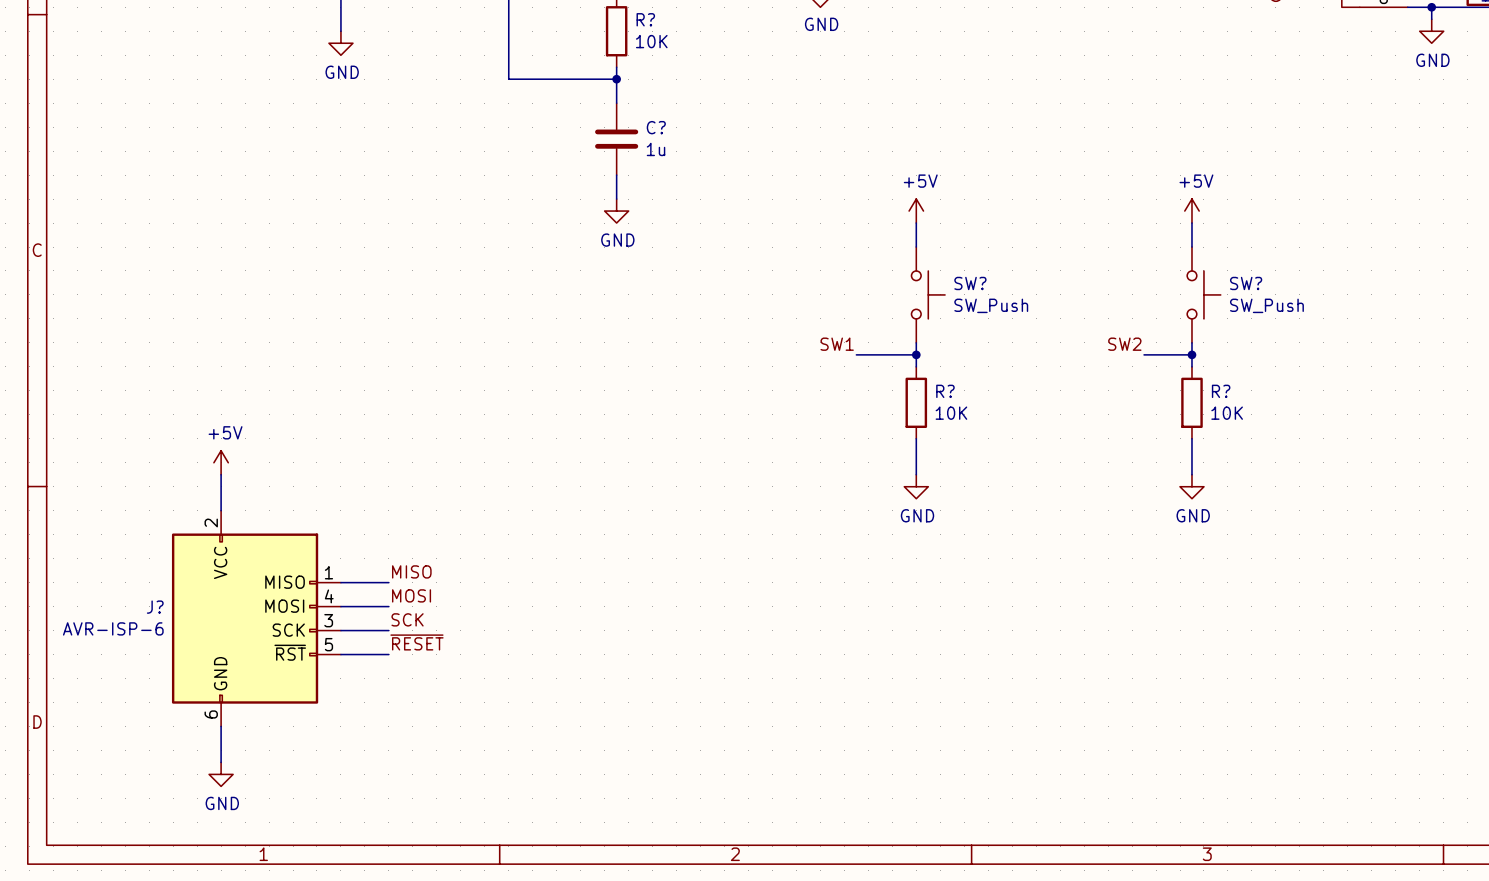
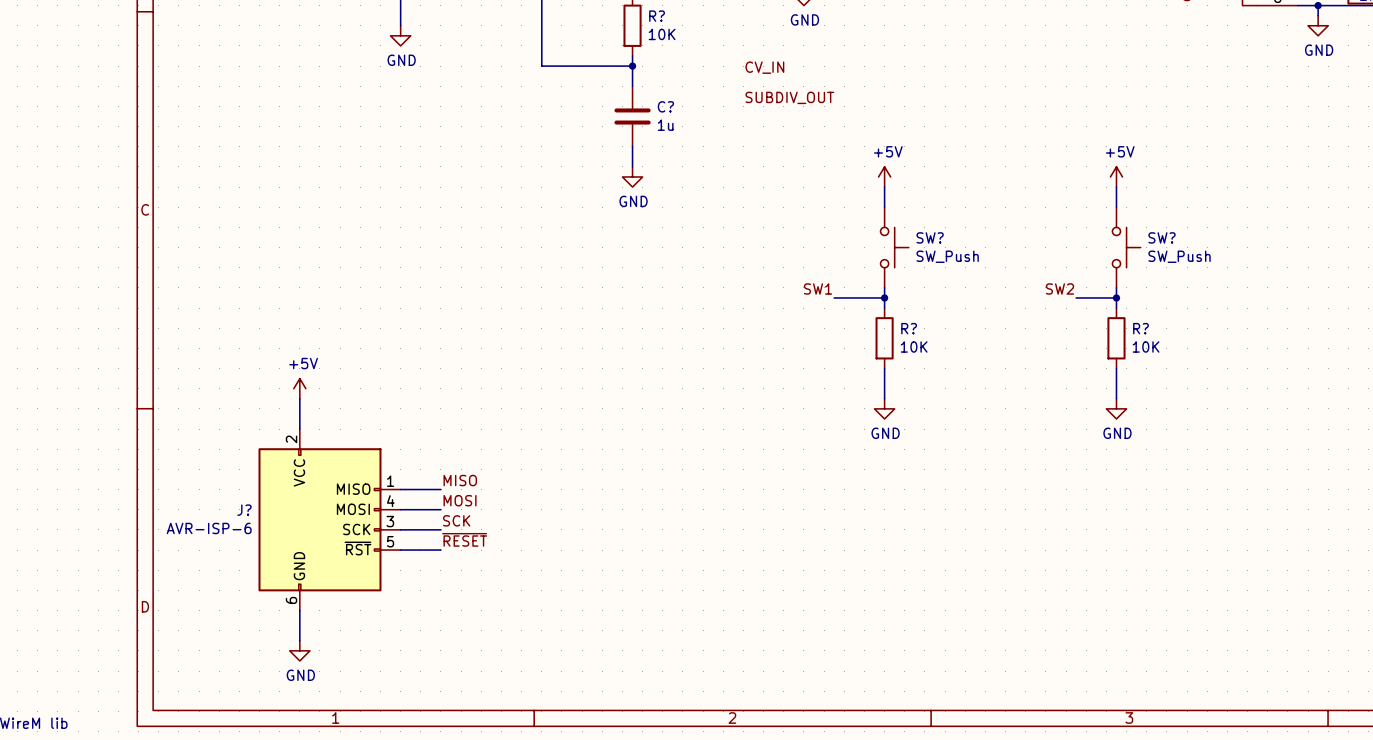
label: none -> CV_IN (764, 67)
label: none -> SUBDIV_OUT (789, 97)

